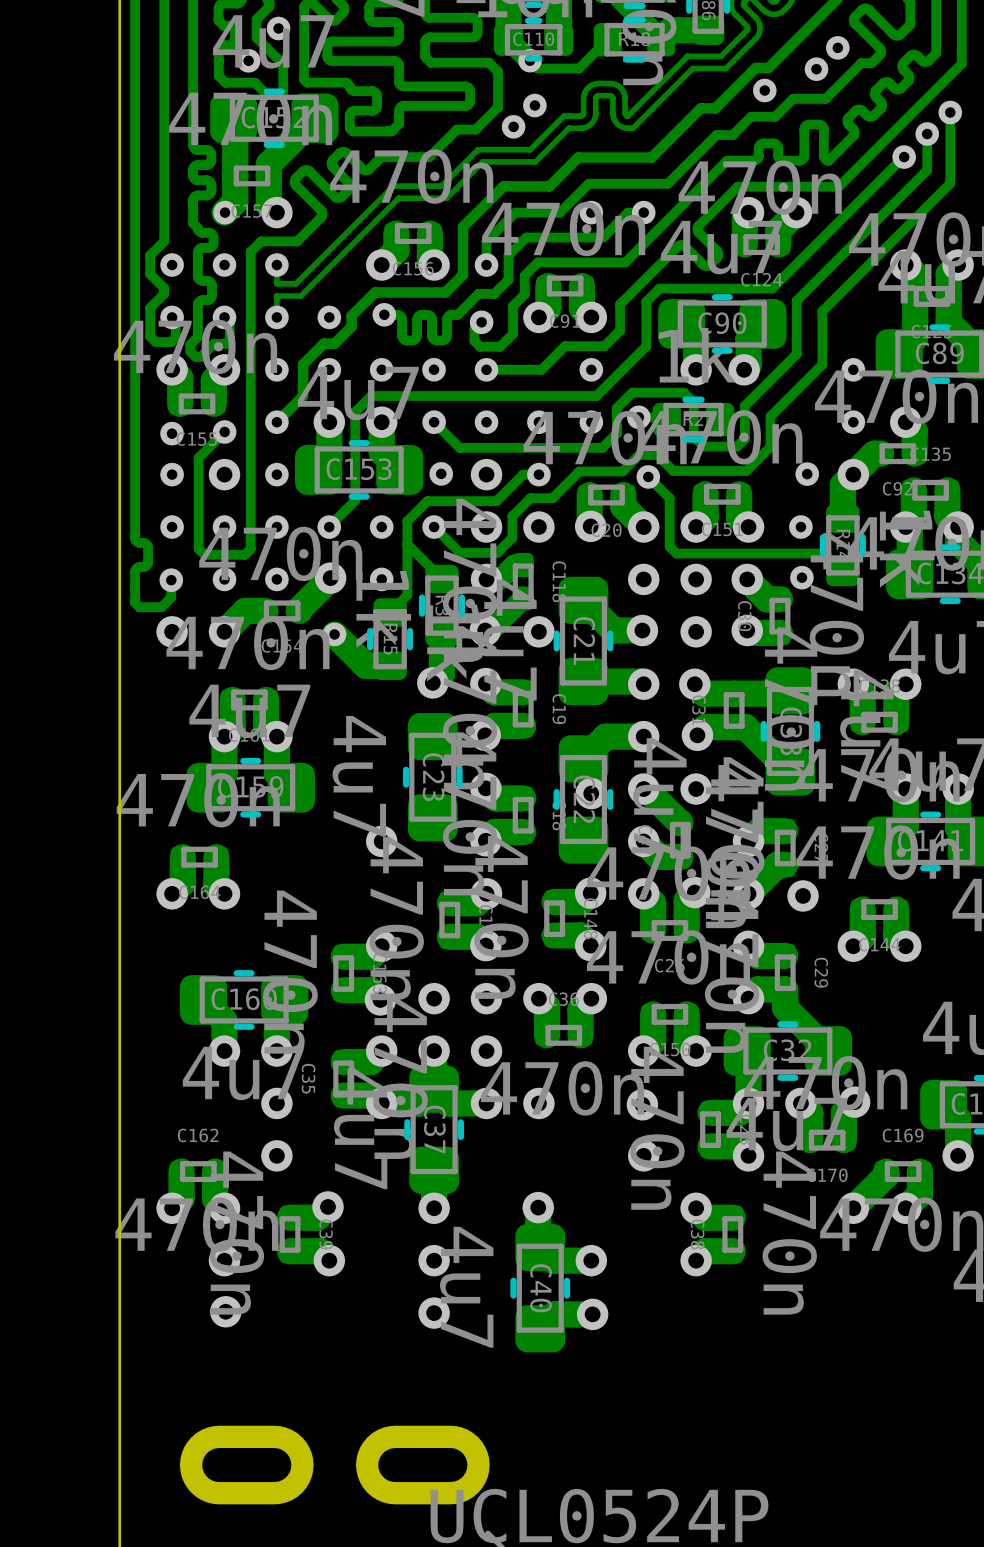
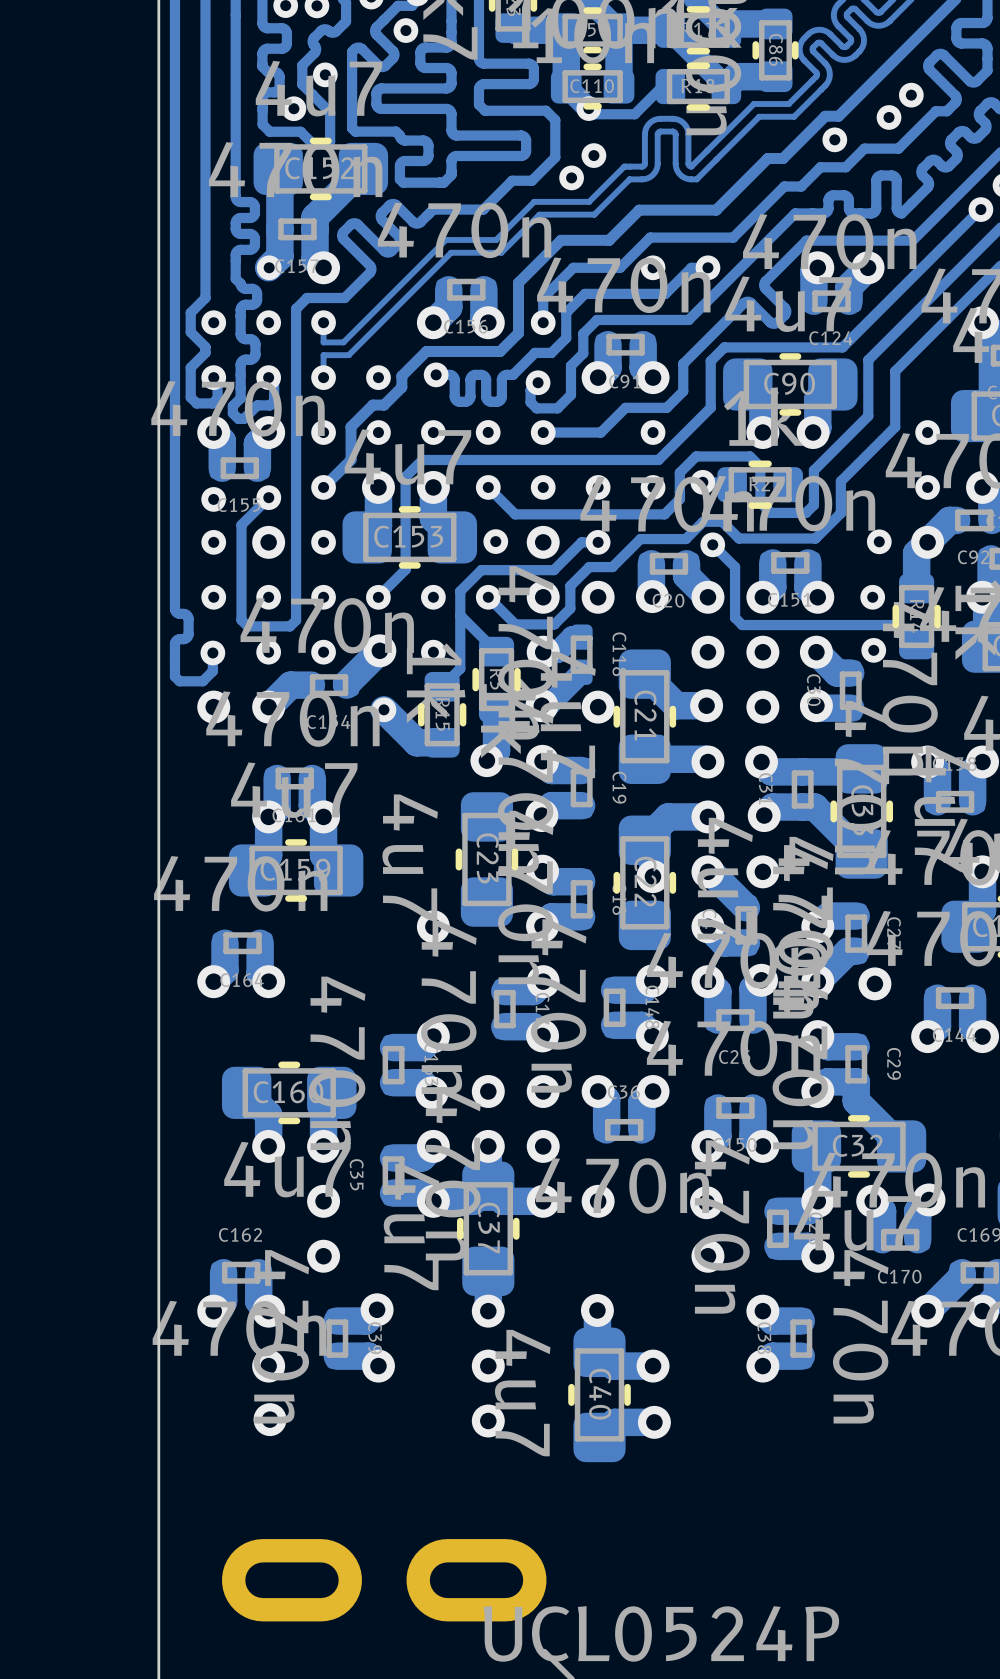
track: (607, 39) (579, 68) (537, 68) (508, 39) -> (670, 86) (662, 86) (634, 114) (594, 114) (588, 108)
track: (612, 98) (610, 95) (597, 95) (595, 98) -> (675, 148) (675, 133) (672, 131) (658, 132) (657, 148)
track: (625, 98) (620, 87) (610, 83) (591, 85) (585, 91) (583, 98) -> (688, 148) (686, 126) (680, 120) (672, 118) (658, 118) (649, 123) (645, 132) (644, 148)

